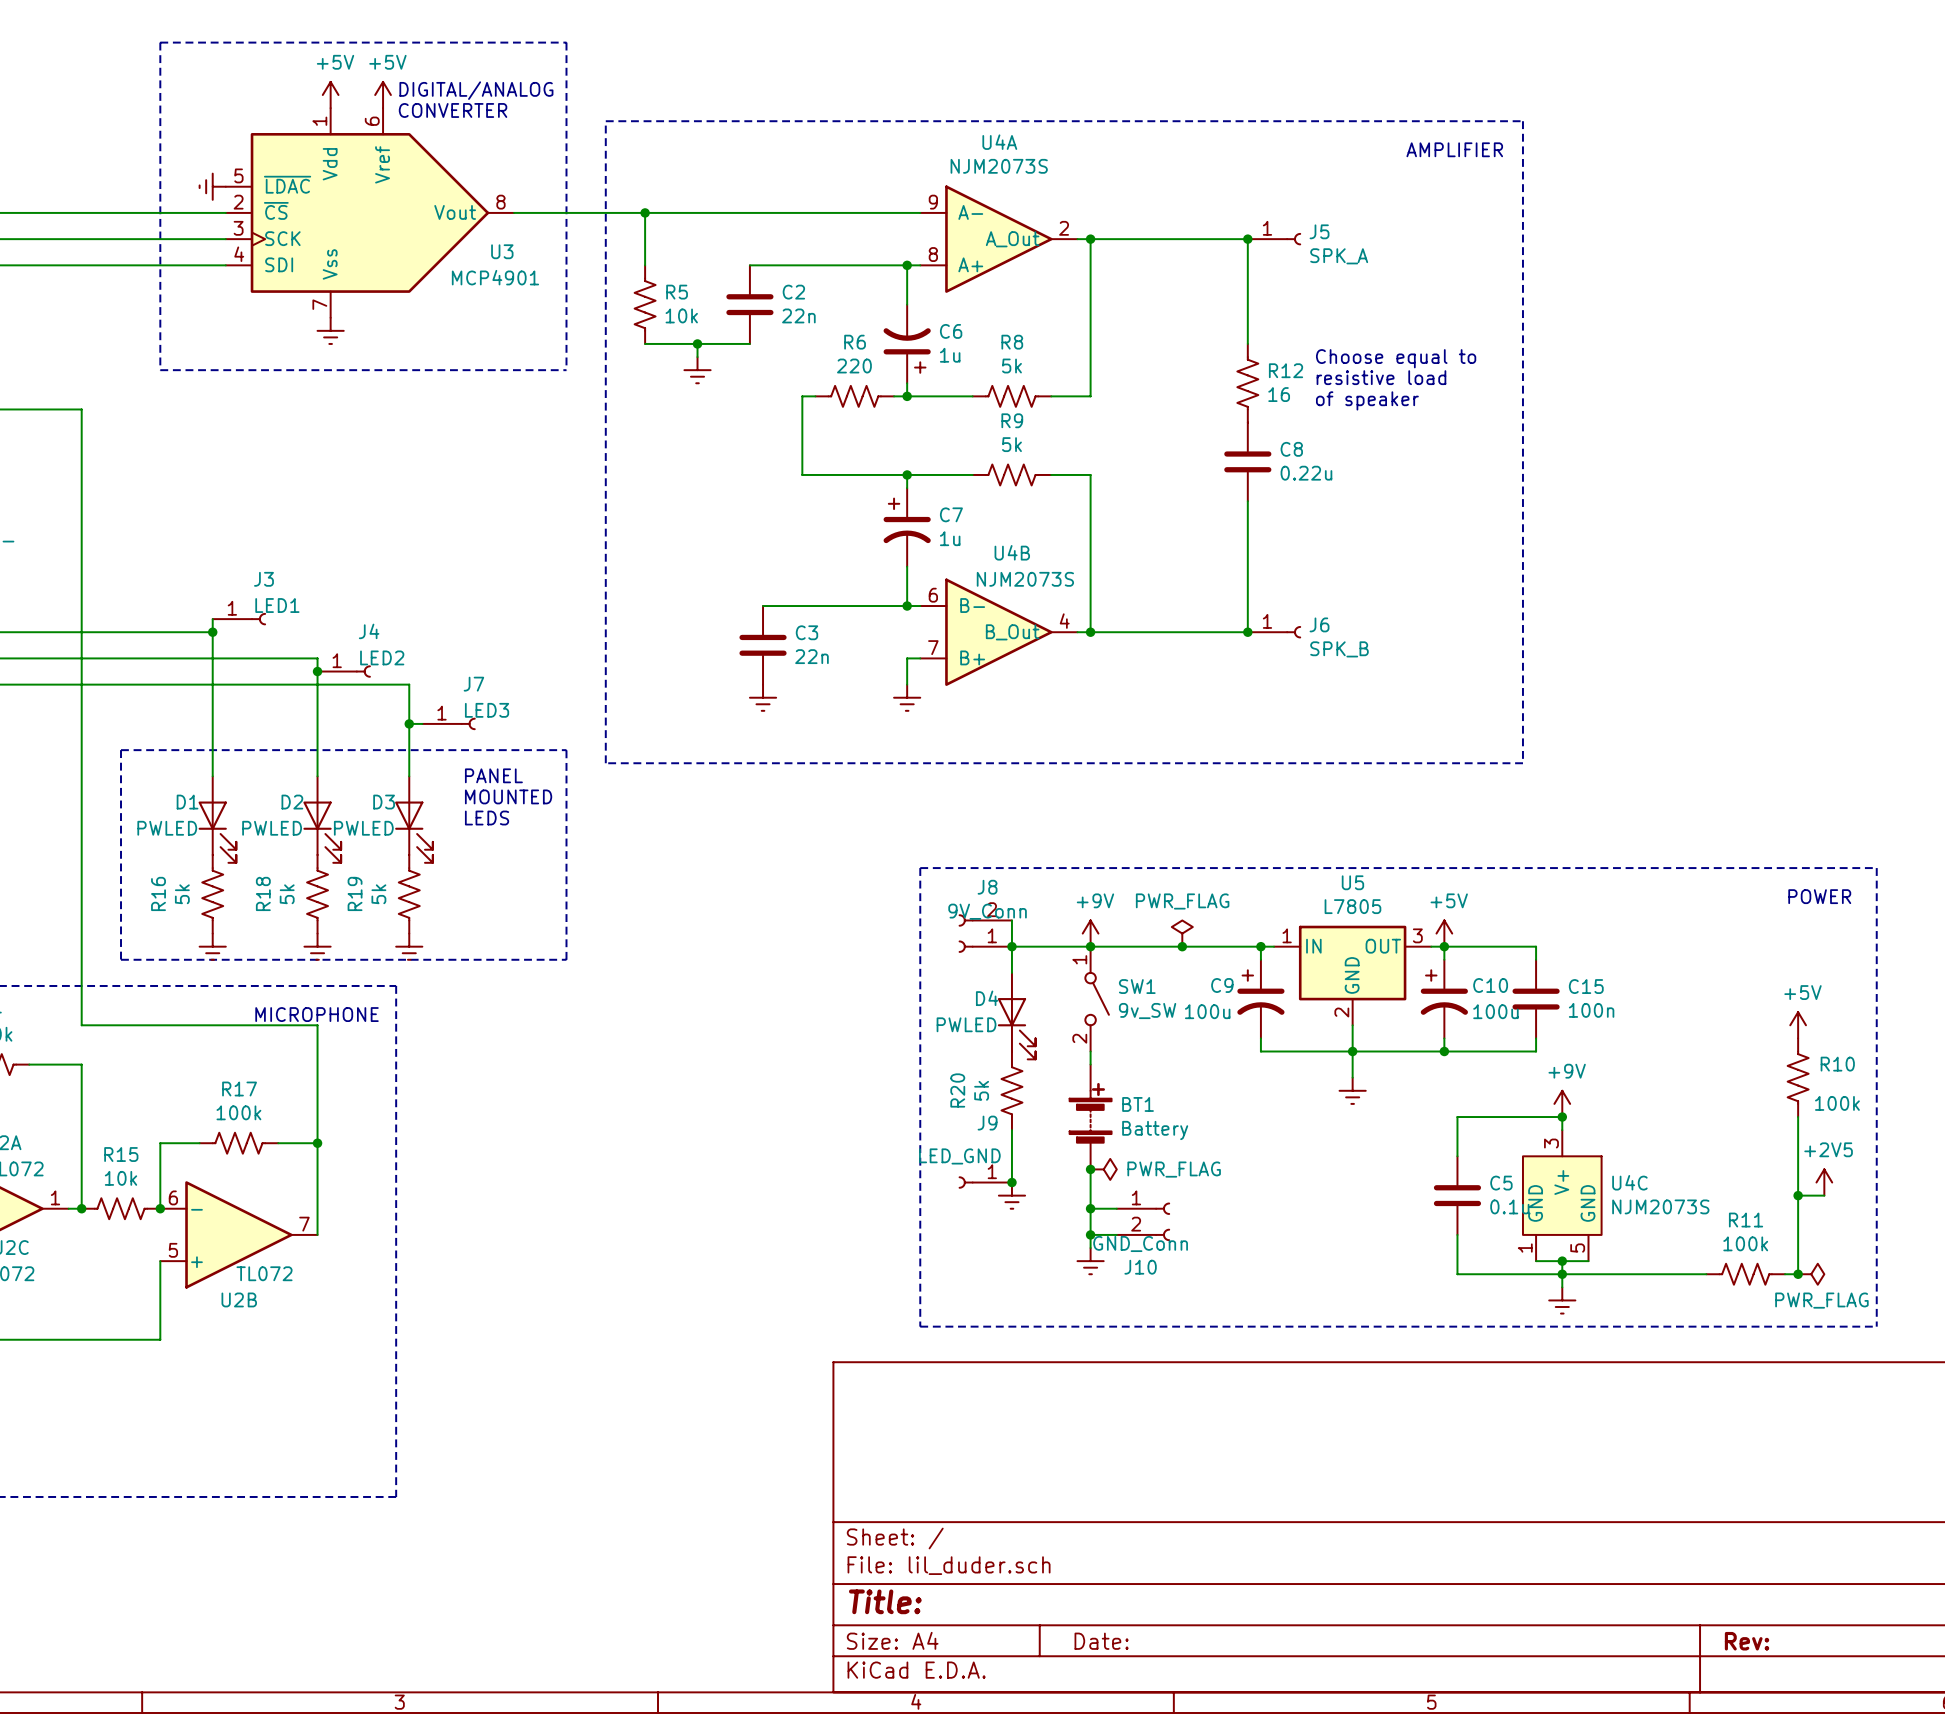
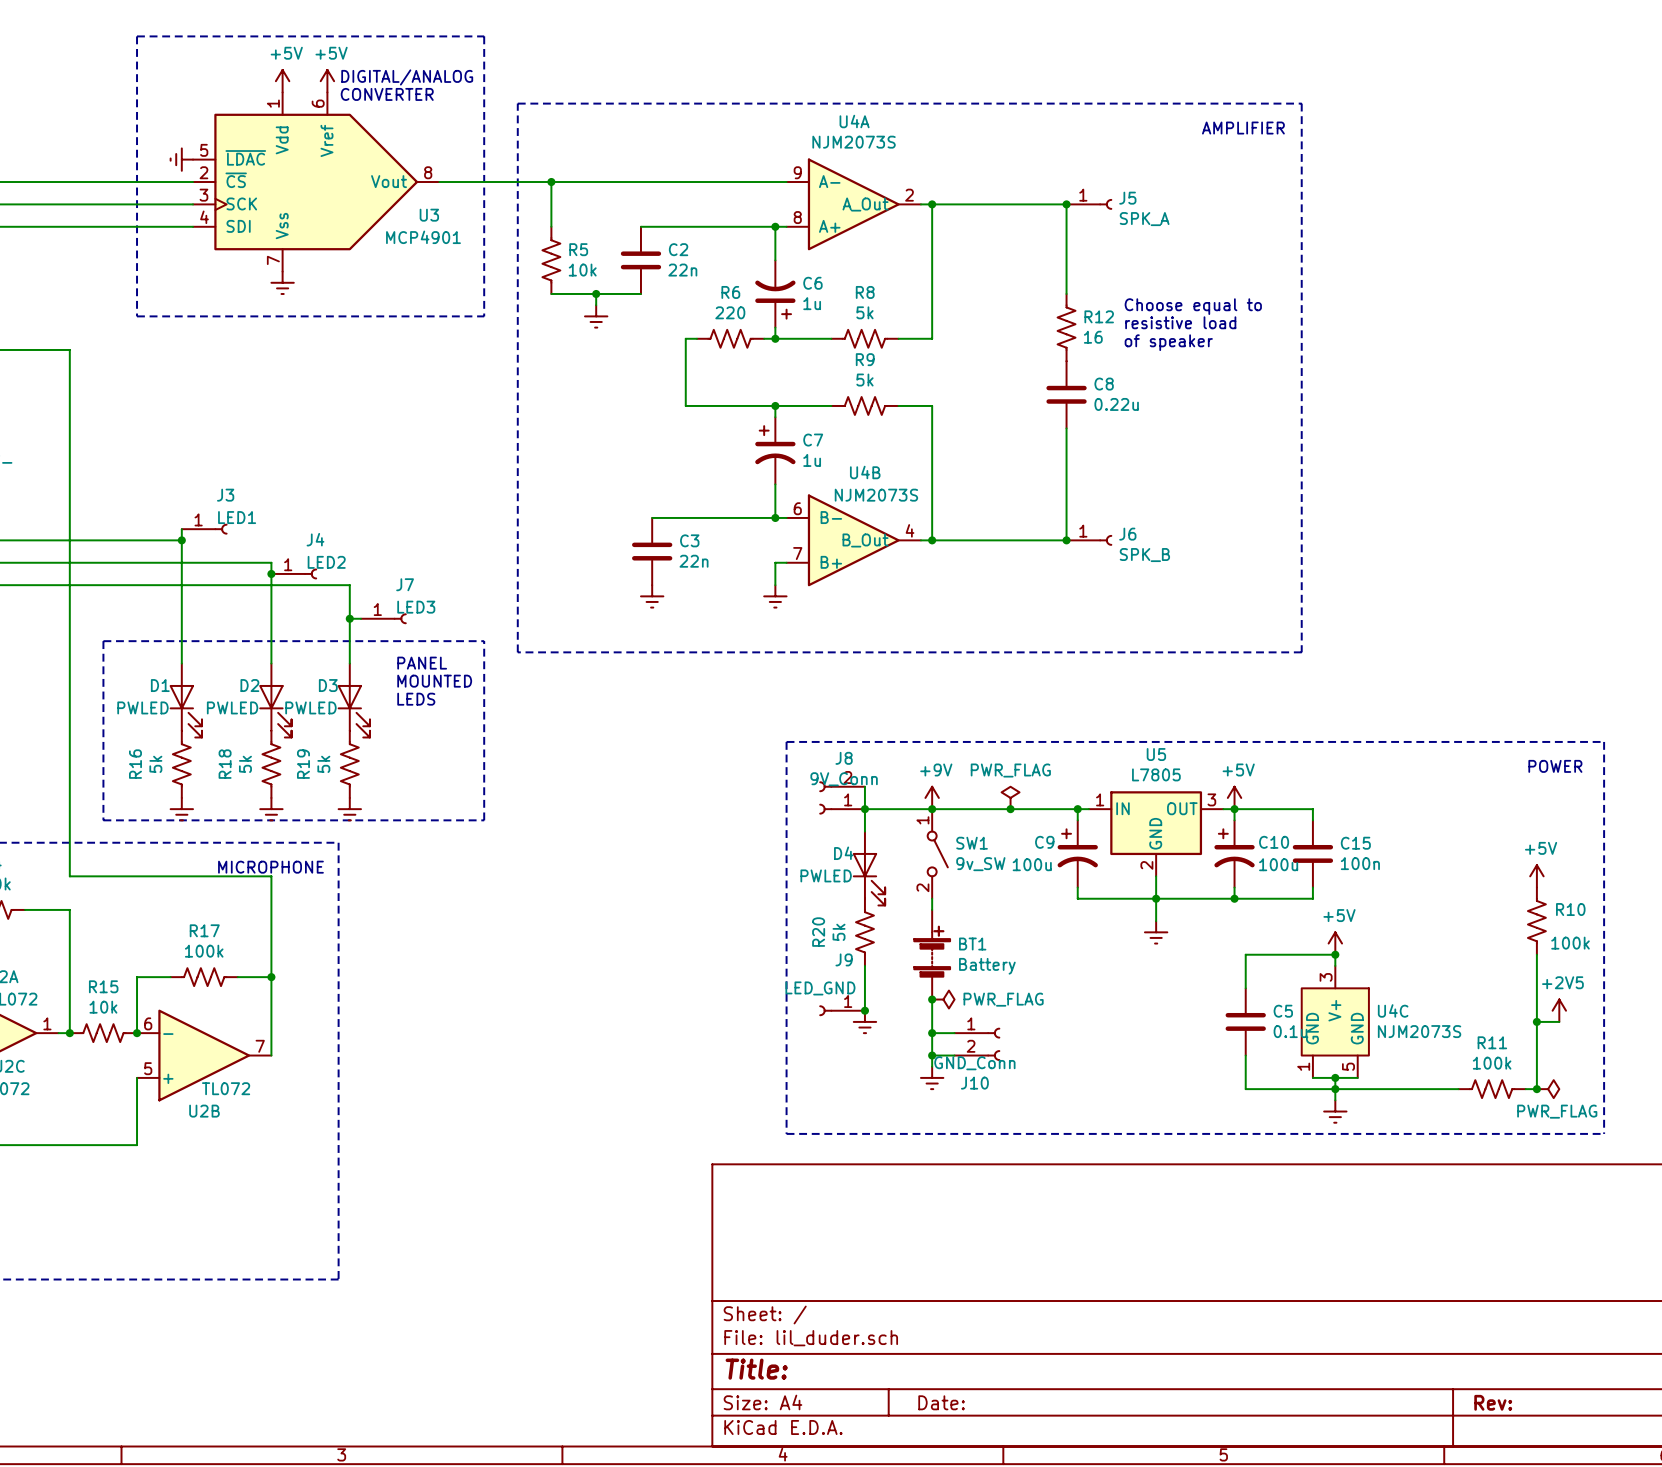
power symbol: +9V (1562, 1103) -> +5V (1335, 943)

